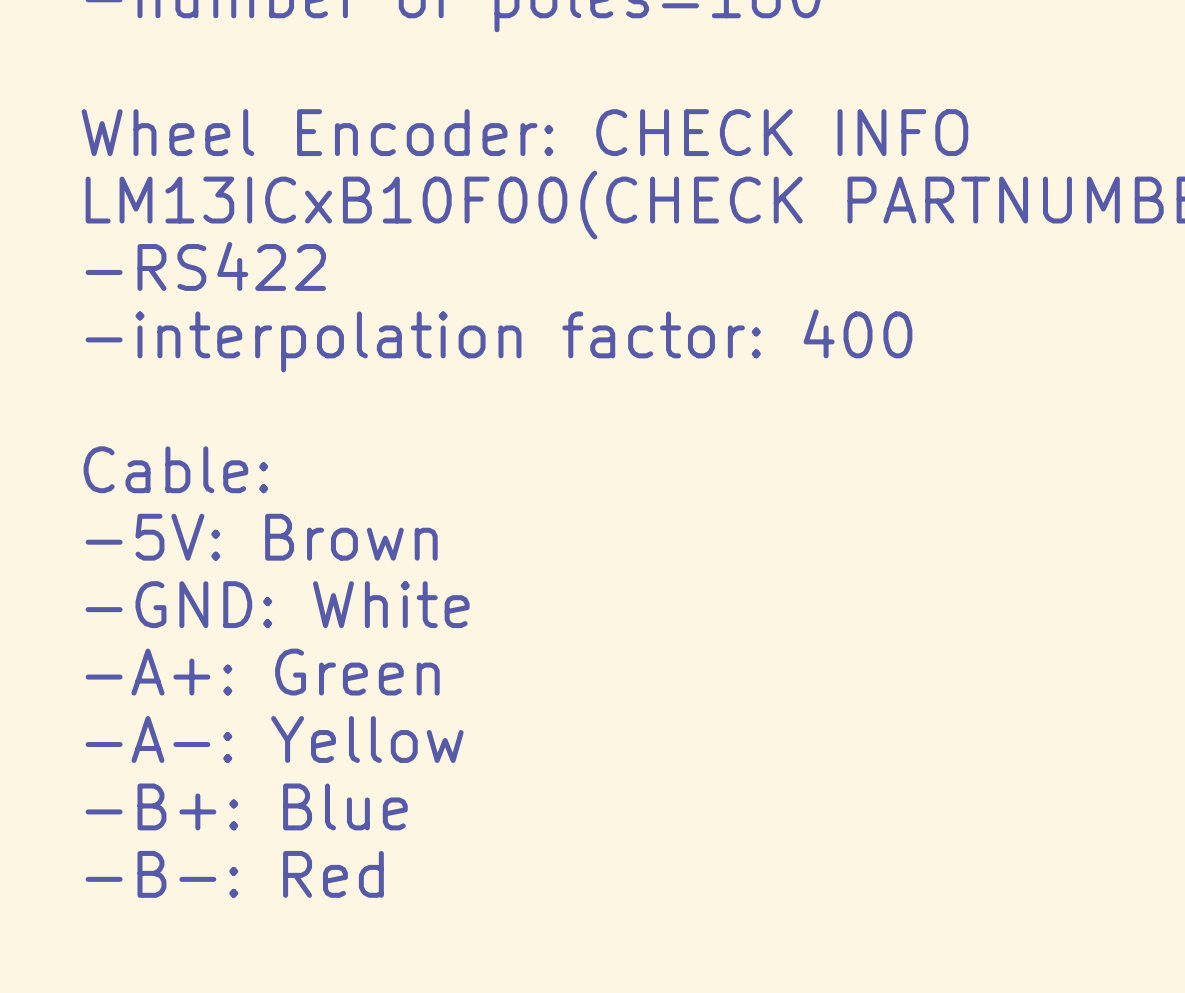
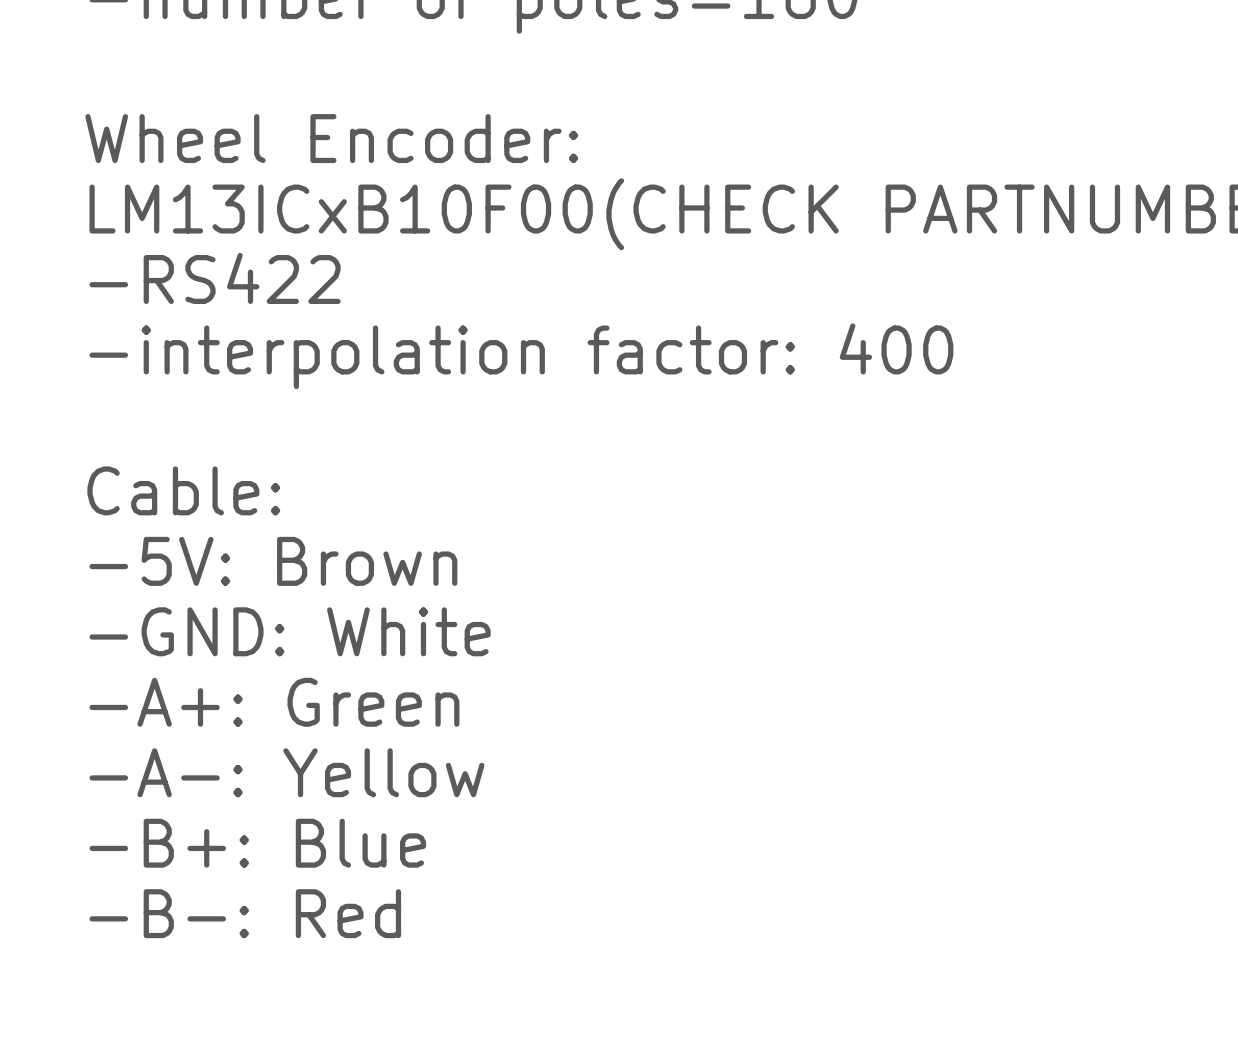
text: Wheel Encoder: CHECK INFO (524, 132) -> Wheel Encoder: (331, 138)

